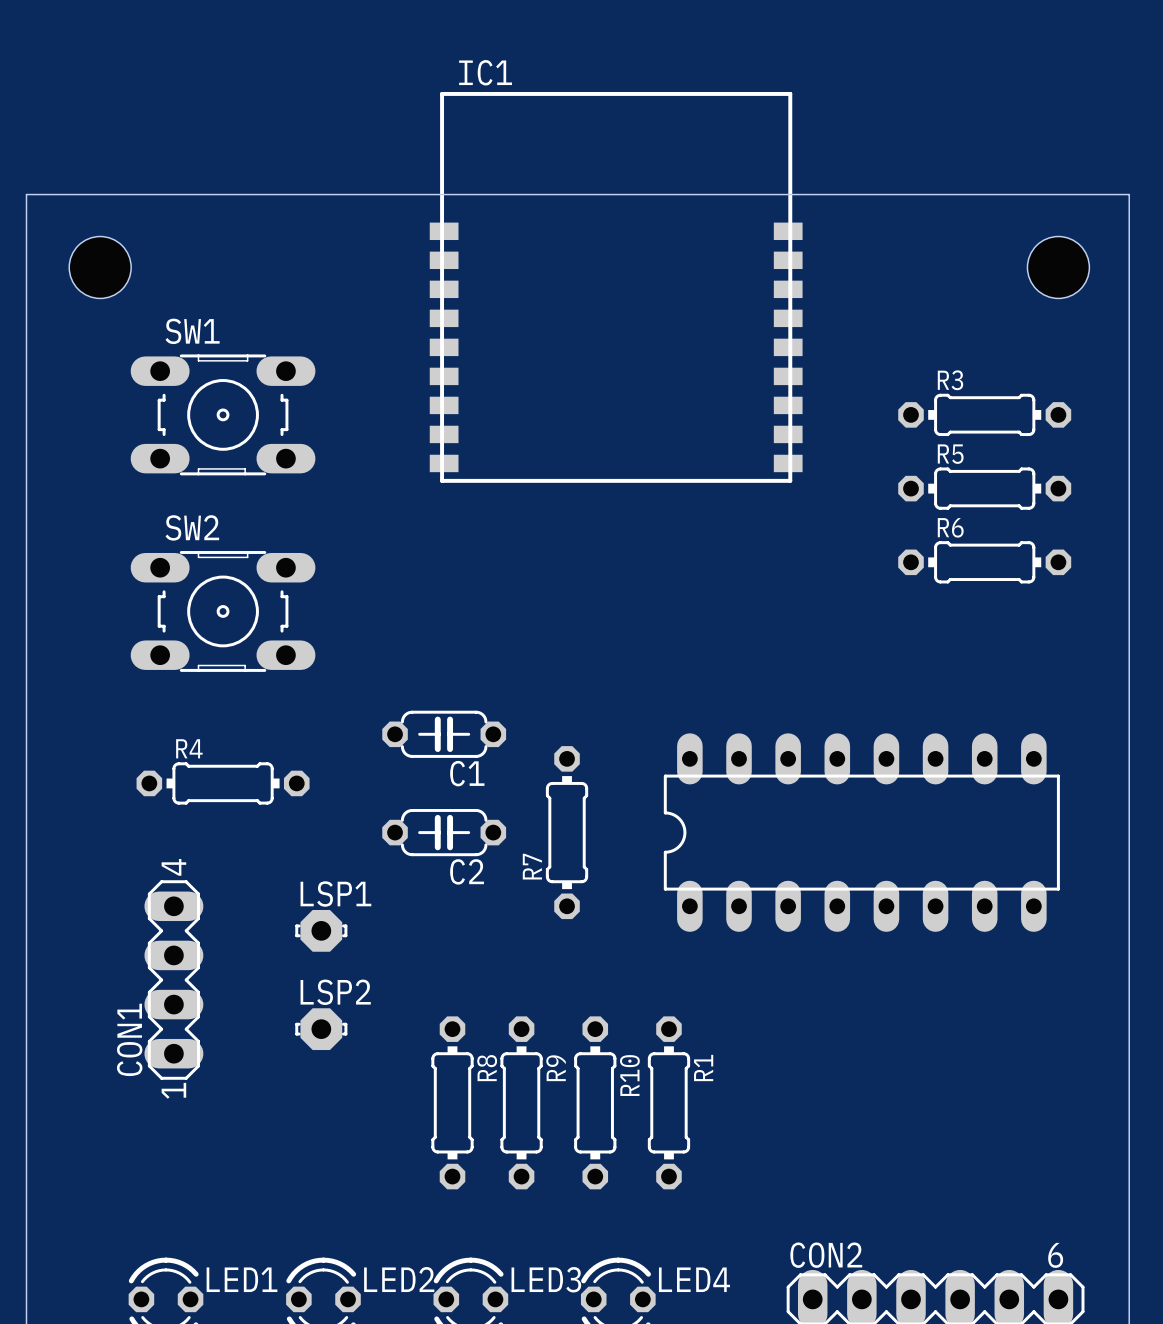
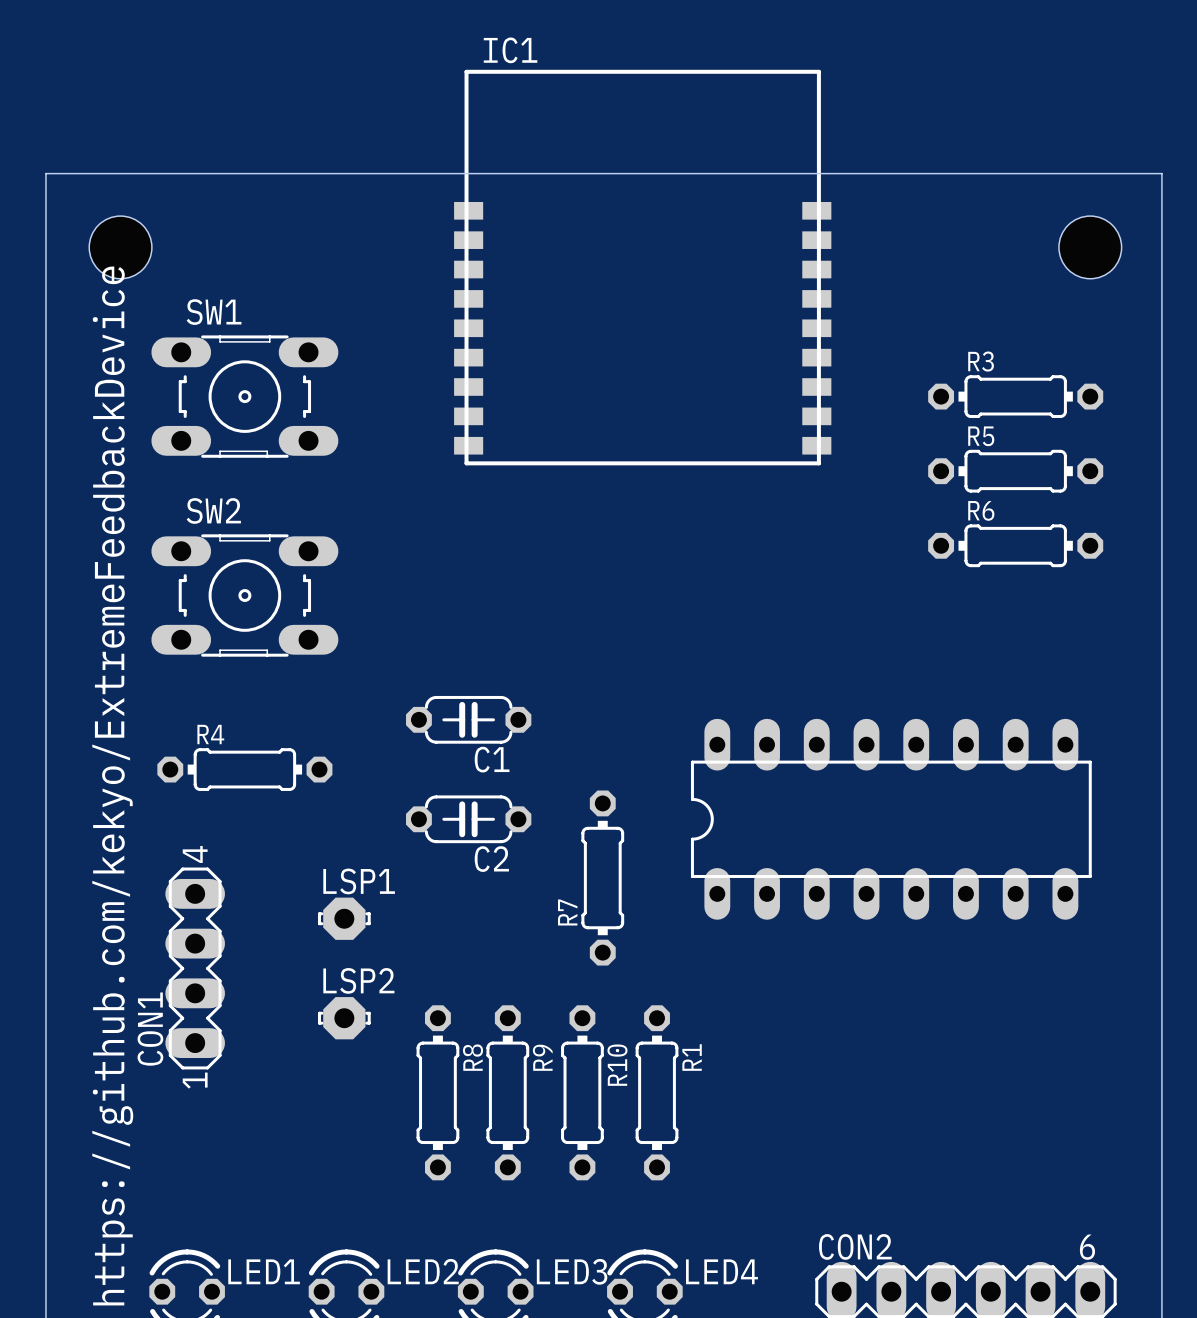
text: none -> https://github.com/kekyo/ExtremeFeedbackDevice (112, 785)
R7 position: (567, 832) -> (602, 878)
R8 position: (452, 1102) -> (437, 1092)
R9 position: (521, 1102) -> (507, 1092)
R10 position: (595, 1102) -> (582, 1092)
R1 position: (668, 1102) -> (657, 1092)

